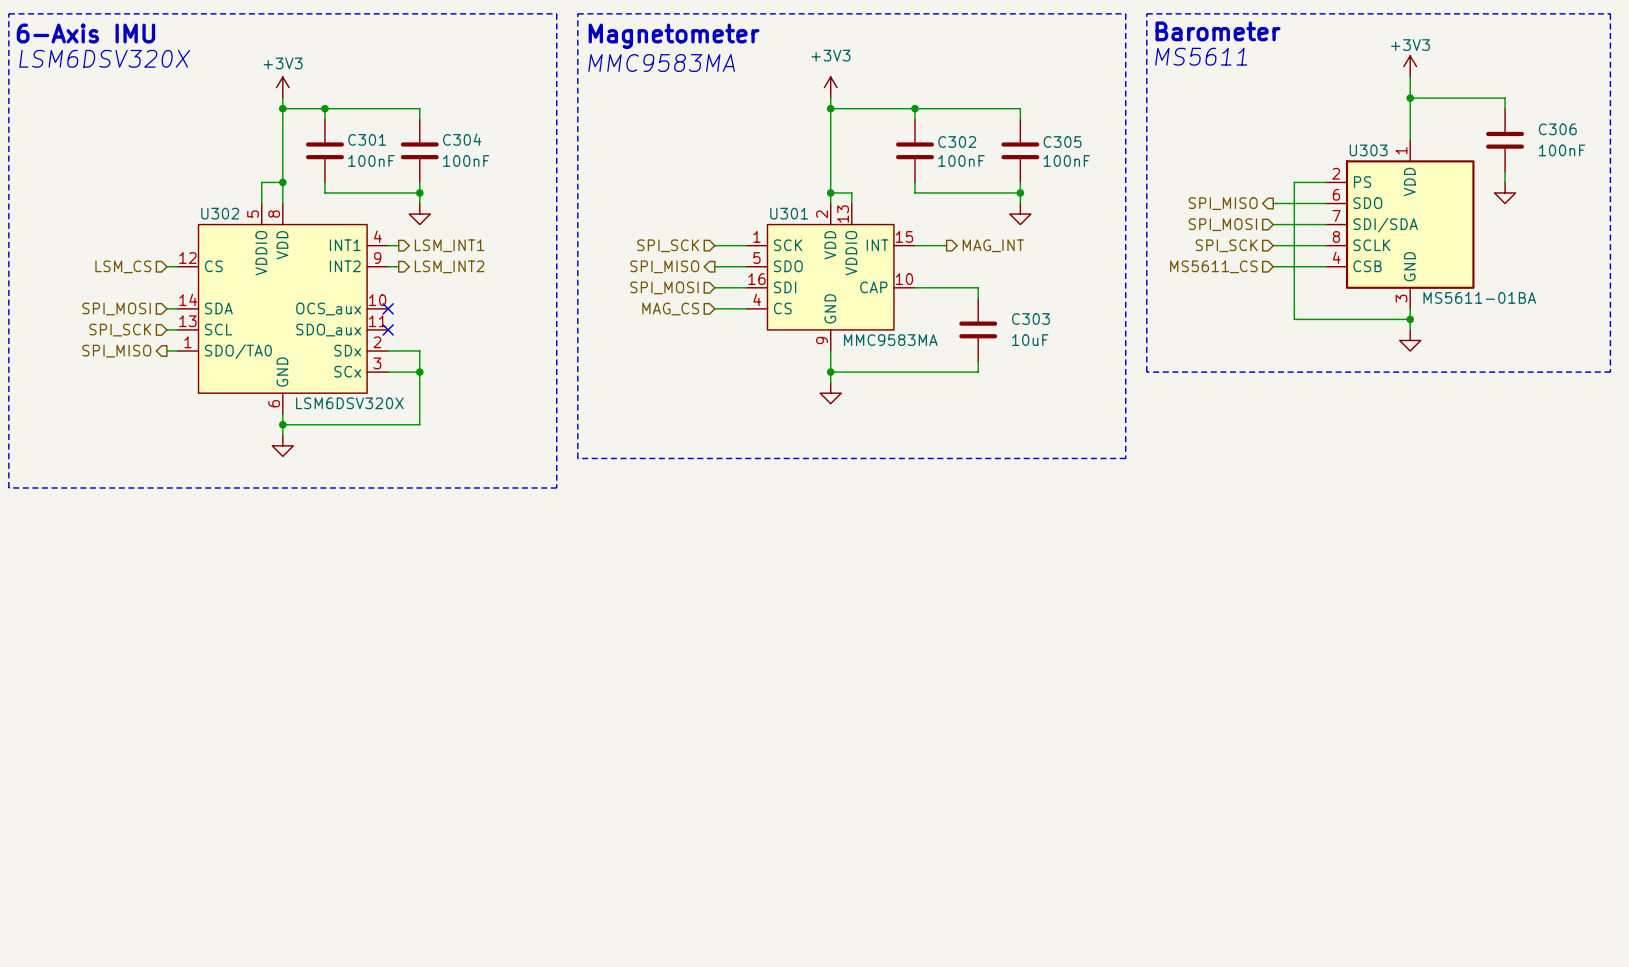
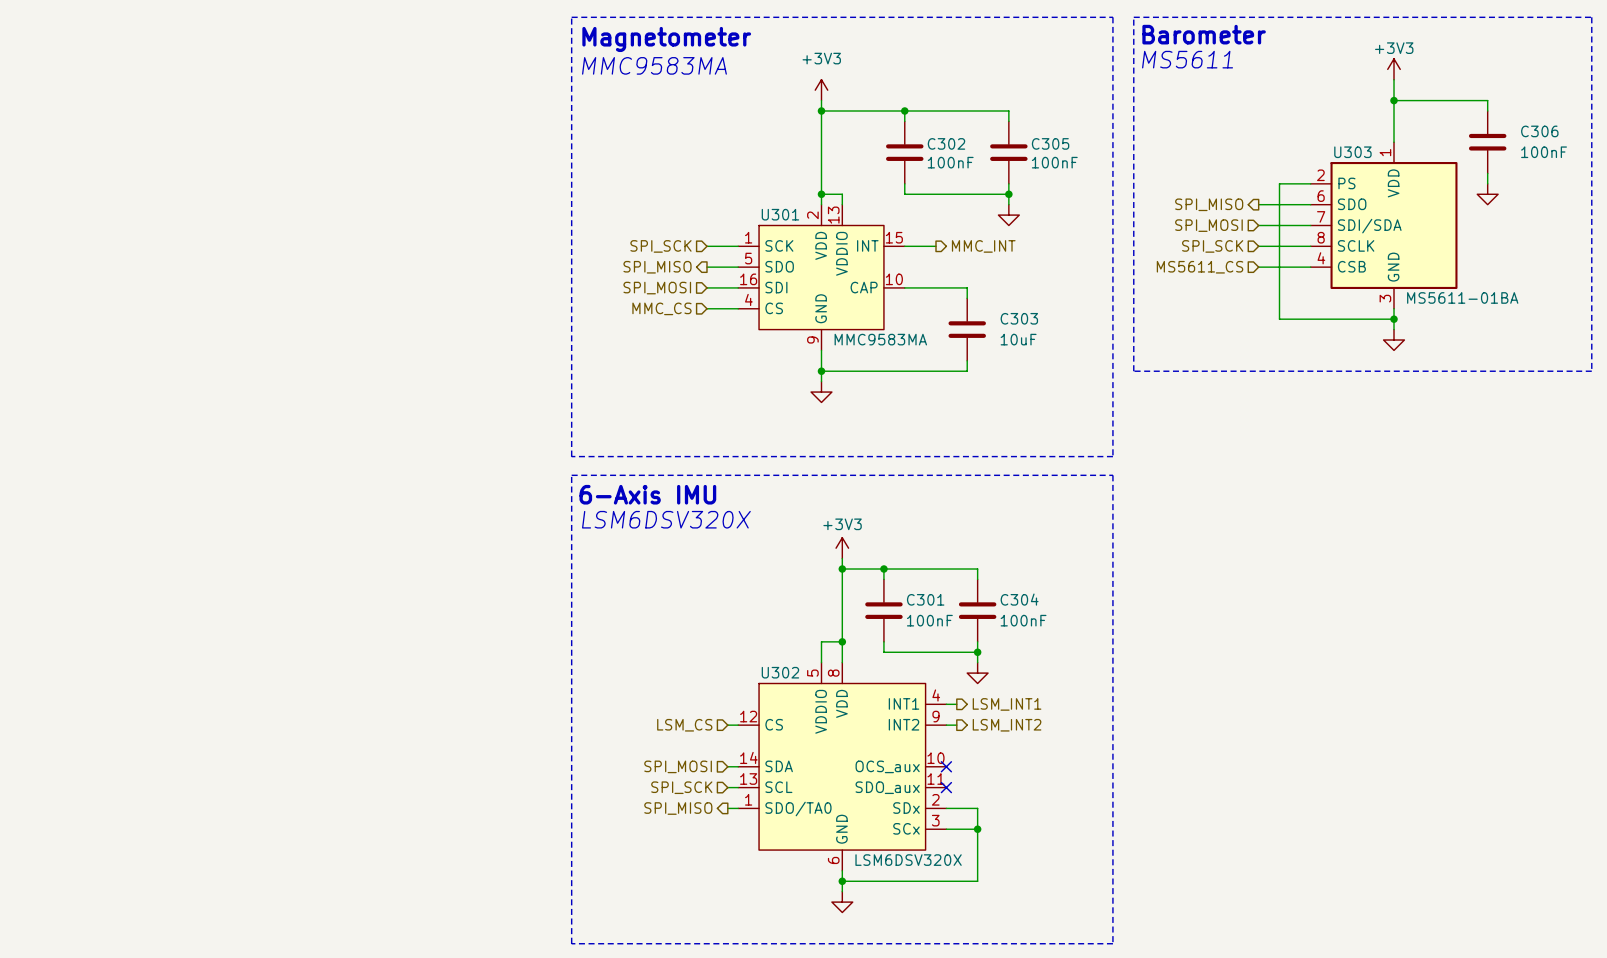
line: (8, 13) (556, 13) (556, 487) (8, 487) (8, 13) -> none
text: 6-Axis IMU (85, 33) -> none
text: LSM6DSV320X (104, 58) -> none
power symbol: +3V3 (282, 87) -> none
wire: (282, 98) (282, 203) -> none
wire: (282, 108) (419, 108) (419, 119) -> none
junction: (282, 108) -> none
wire: (324, 108) (324, 119) -> none
junction: (324, 108) -> none
C301 position: (324, 150) -> (883, 610)
C304 position: (419, 150) -> (977, 610)
wire: (282, 182) (261, 182) (261, 203) -> none
junction: (282, 182) -> none
wire: (324, 182) (324, 192) (419, 192) -> none
wire: (419, 182) (419, 203) -> none
junction: (419, 192) -> none
power symbol: (419, 214) -> none
wire: (388, 245) (398, 245) -> none
hierarchical label: LSM_INT1 (449, 245) -> none
hierarchical label: MAG_INT (993, 245) -> MMC_INT (983, 246)
hierarchical label: LSM_CS (123, 266) -> none
wire: (166, 266) (177, 266) -> none
wire: (388, 266) (398, 266) -> none
hierarchical label: LSM_INT2 (449, 266) -> none
hierarchical label: SPI_MOSI (116, 308) -> none
wire: (166, 308) (177, 308) -> none
U302 position: (282, 308) -> (842, 766)
no-connect mark: (388, 308) -> none
hierarchical label: MAG_CS (670, 308) -> MMC_CS (661, 308)
wire: (166, 329) (177, 329) -> none
no-connect mark: (388, 329) -> none
hierarchical label: SPI_SCK (120, 330) -> none
hierarchical label: SPI_MISO (116, 351) -> none
wire: (166, 351) (177, 351) -> none
wire: (388, 351) (419, 351) (419, 424) (282, 424) -> none
wire: (388, 372) (419, 372) -> none
junction: (419, 372) -> none
wire: (282, 414) (282, 435) -> none
junction: (282, 424) -> none
power symbol: (282, 445) -> none
line: none -> (571, 475) (1112, 475) (1112, 943) (571, 943) (571, 475)
text: none -> 6-Axis IMU (647, 494)
text: none -> LSM6DSV320X (666, 519)
power symbol: none -> +3V3 (842, 548)
wire: none -> (842, 558) (842, 662)
wire: none -> (842, 569) (977, 569) (977, 579)
junction: none -> (842, 569)
wire: none -> (883, 569) (883, 579)
junction: none -> (883, 569)
wire: none -> (842, 641) (821, 641) (821, 662)
junction: none -> (842, 641)
wire: none -> (883, 641) (883, 652) (977, 652)
wire: none -> (977, 641) (977, 662)
junction: none -> (977, 652)
power symbol: none -> (977, 673)
wire: none -> (946, 704) (956, 704)
hierarchical label: none -> LSM_INT1 (1007, 704)
hierarchical label: none -> LSM_CS (684, 725)
wire: none -> (727, 725) (738, 725)
wire: none -> (946, 725) (956, 725)
hierarchical label: none -> LSM_INT2 (1007, 725)
hierarchical label: none -> SPI_MOSI (678, 766)
wire: none -> (727, 766) (738, 766)
no-connect mark: none -> (946, 766)
hierarchical label: none -> SPI_SCK (681, 787)
wire: none -> (727, 787) (738, 787)
no-connect mark: none -> (946, 787)
hierarchical label: none -> SPI_MISO (678, 808)
wire: none -> (727, 808) (738, 808)
wire: none -> (946, 808) (977, 808) (977, 881) (842, 881)
wire: none -> (946, 829) (977, 829)
junction: none -> (977, 829)
wire: none -> (842, 870) (842, 891)
junction: none -> (842, 881)
power symbol: none -> (842, 902)

